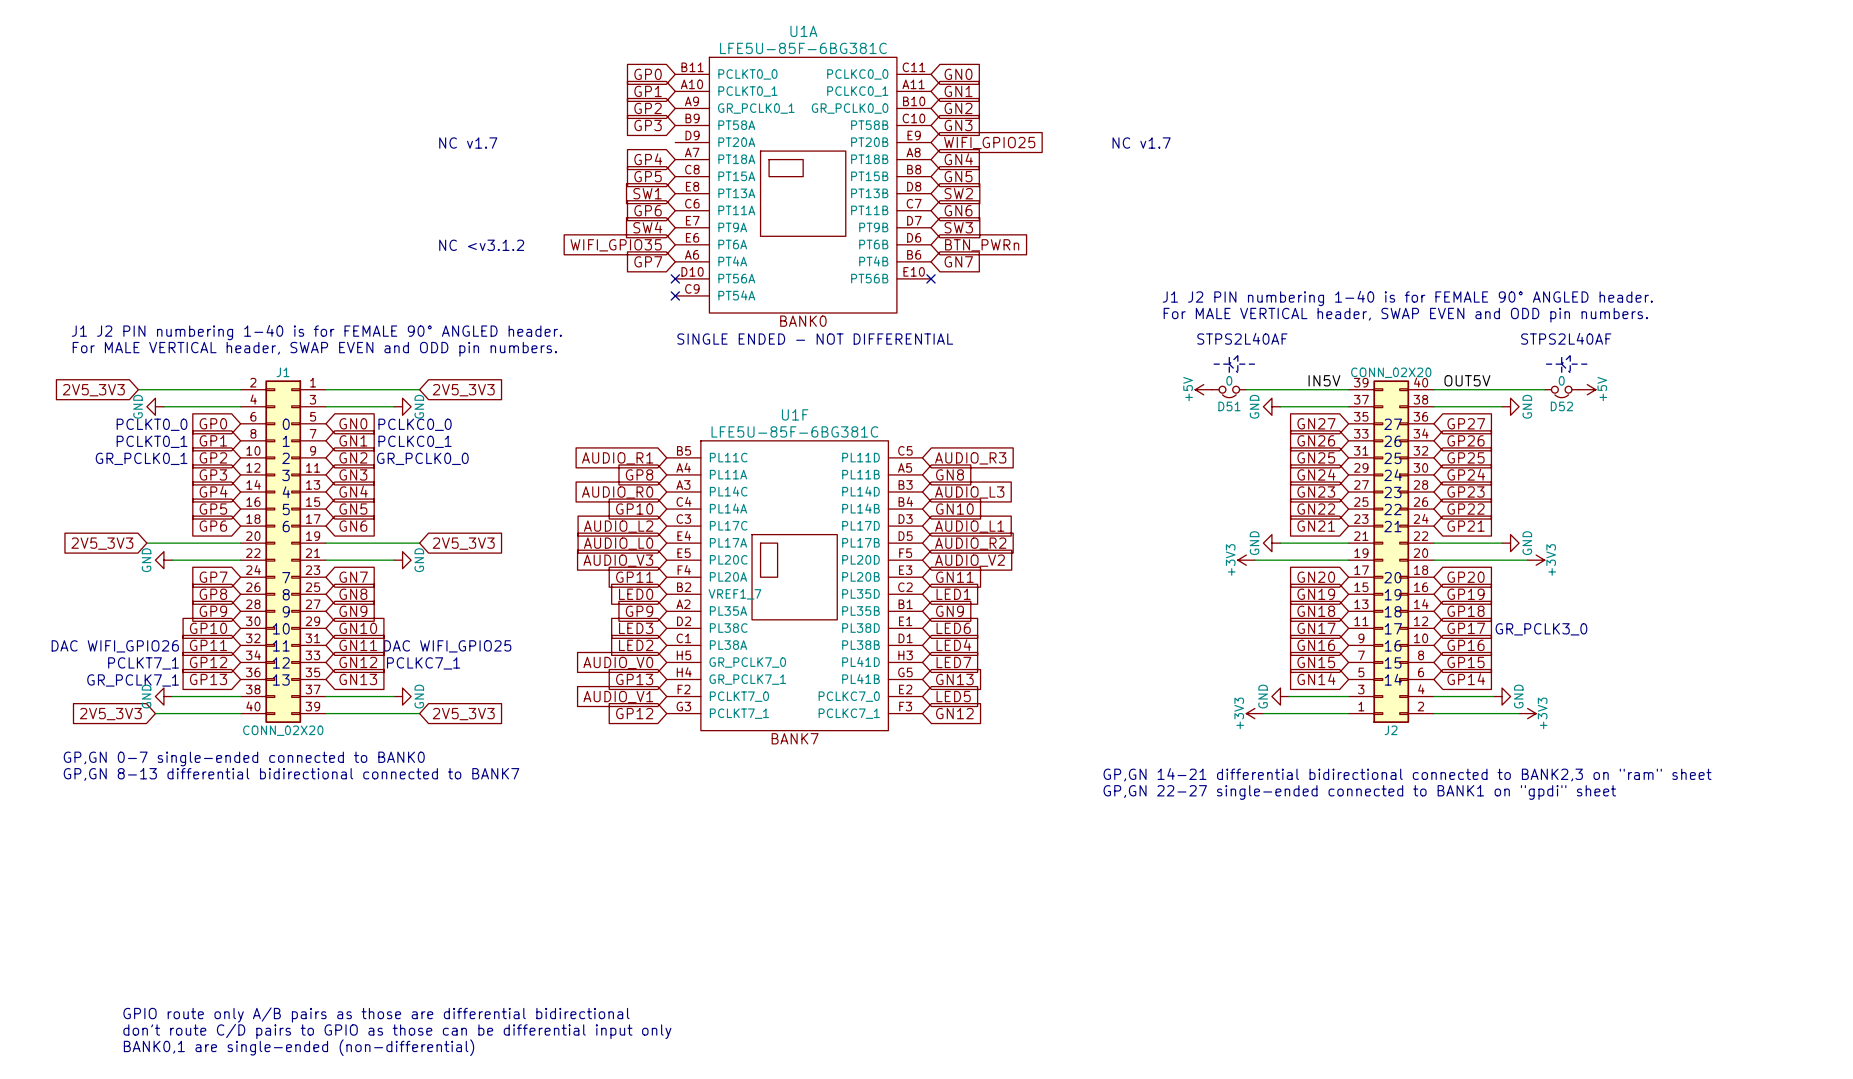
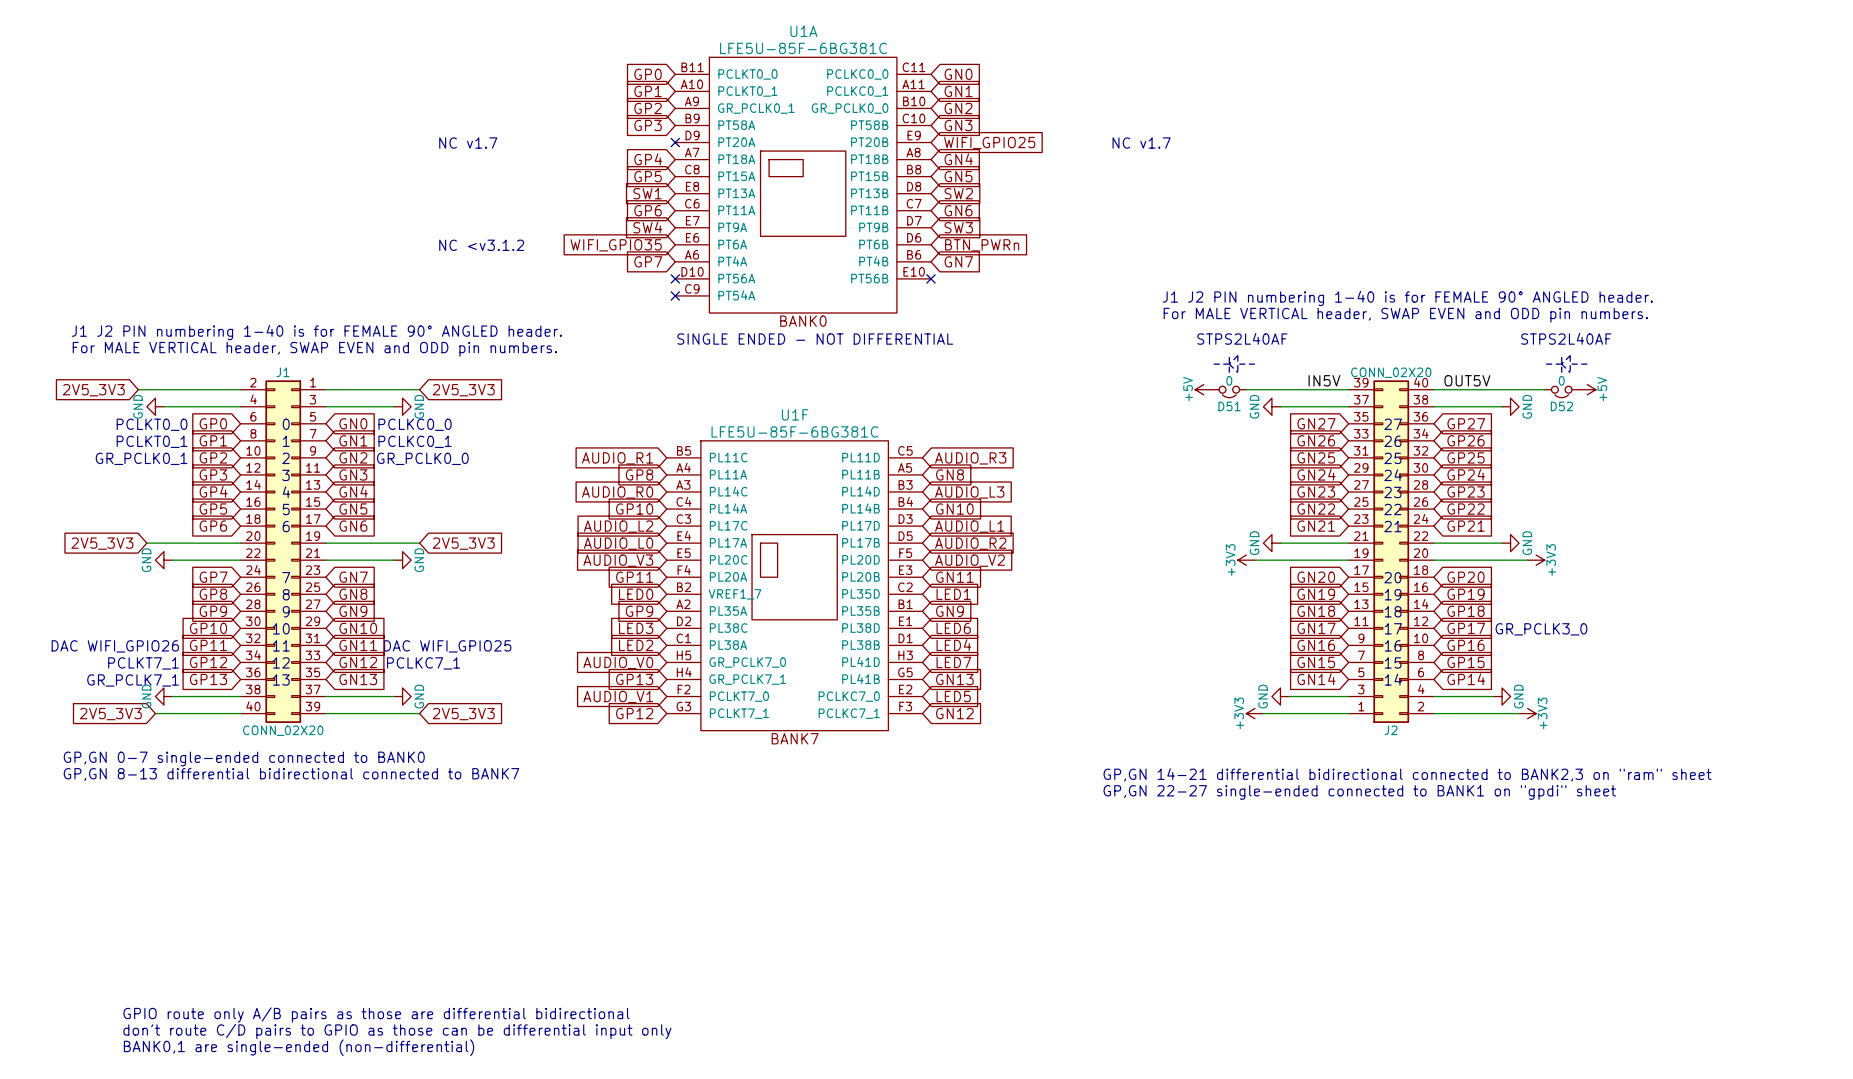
no-connect mark: none -> (675, 142)

